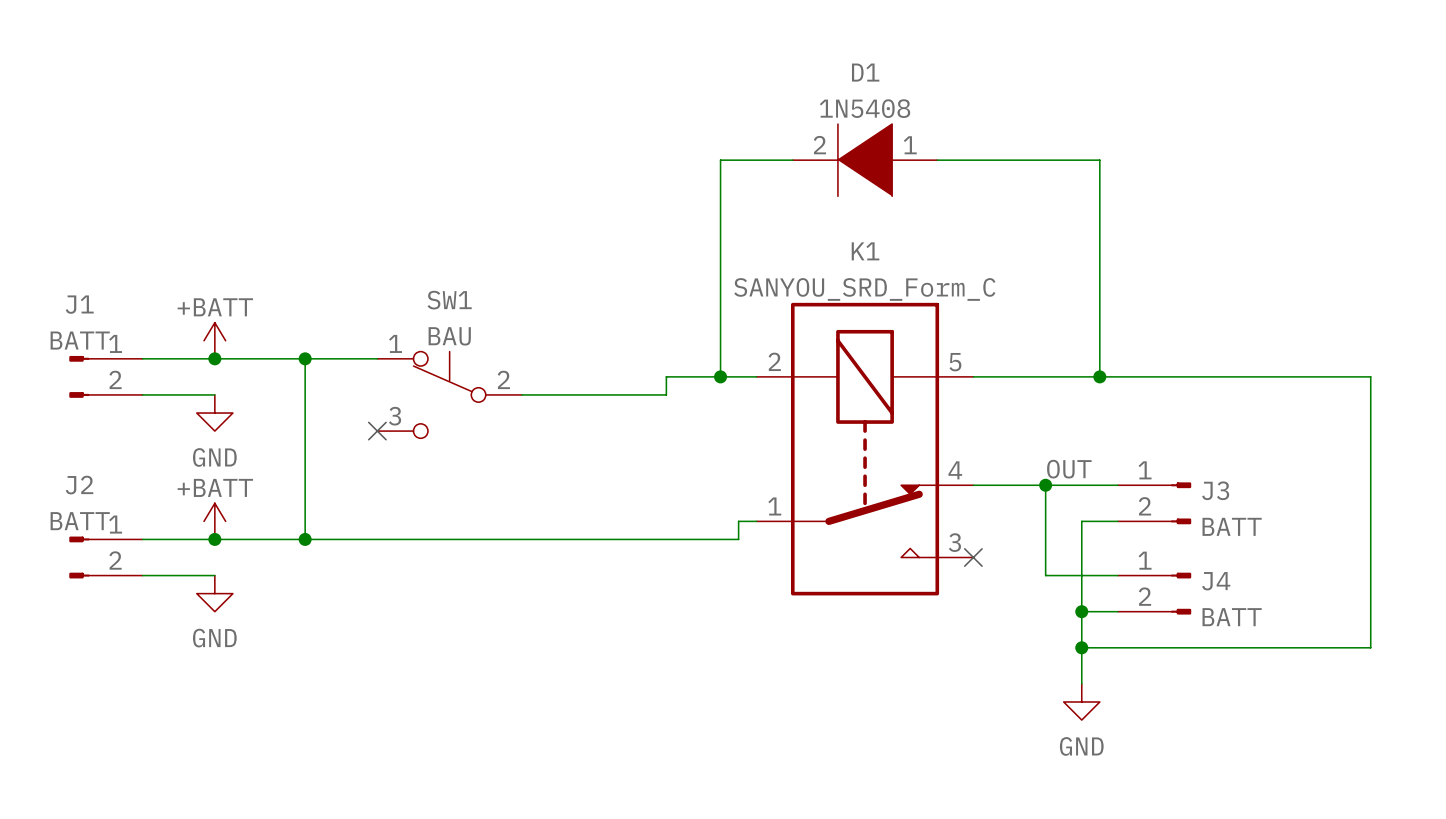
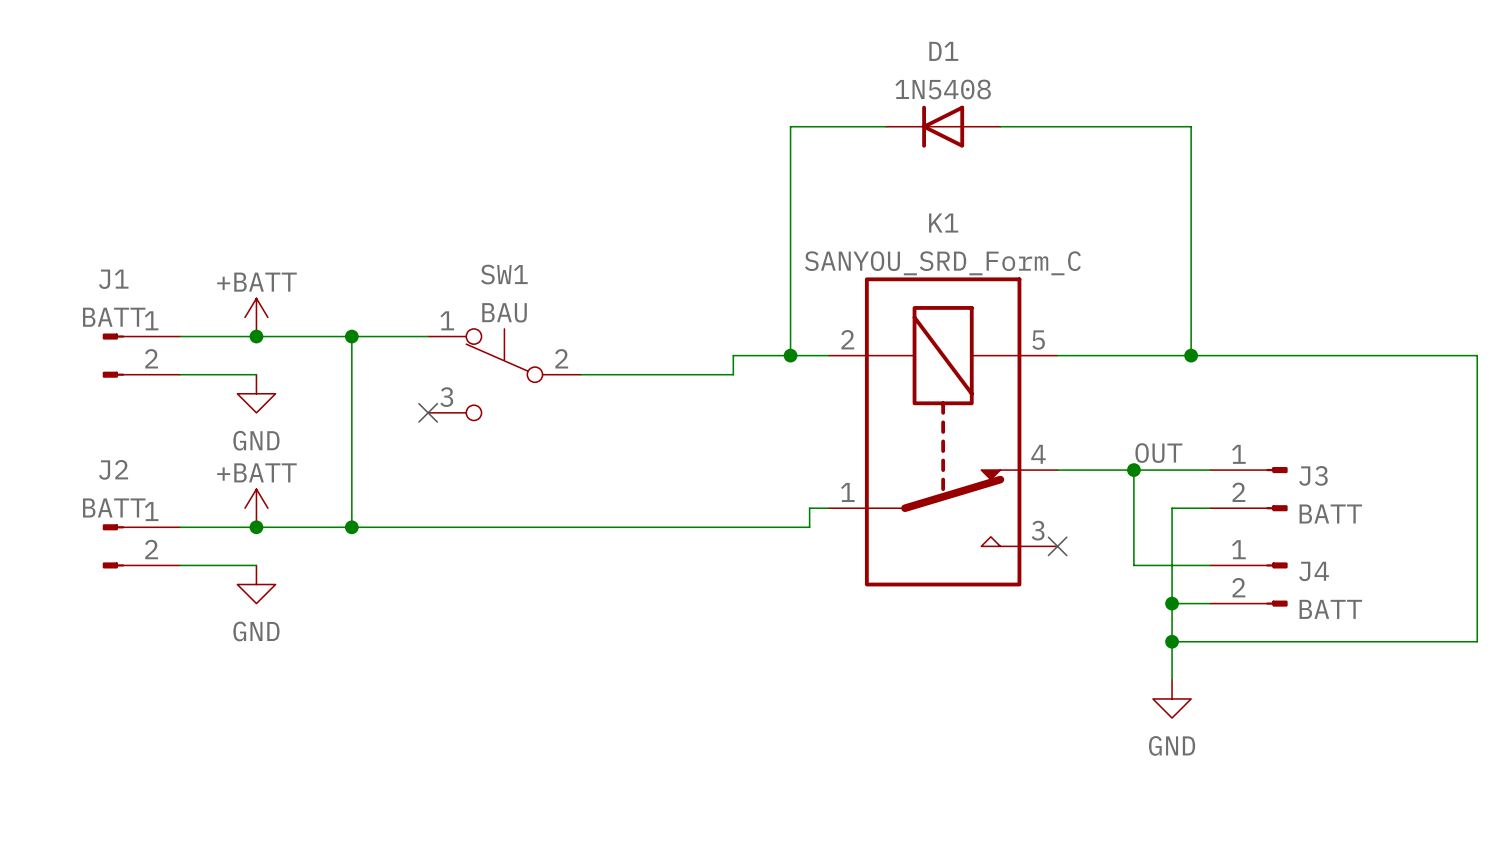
D1 symbol: [792, 124, 938, 197] -> [885, 105, 1001, 148]

